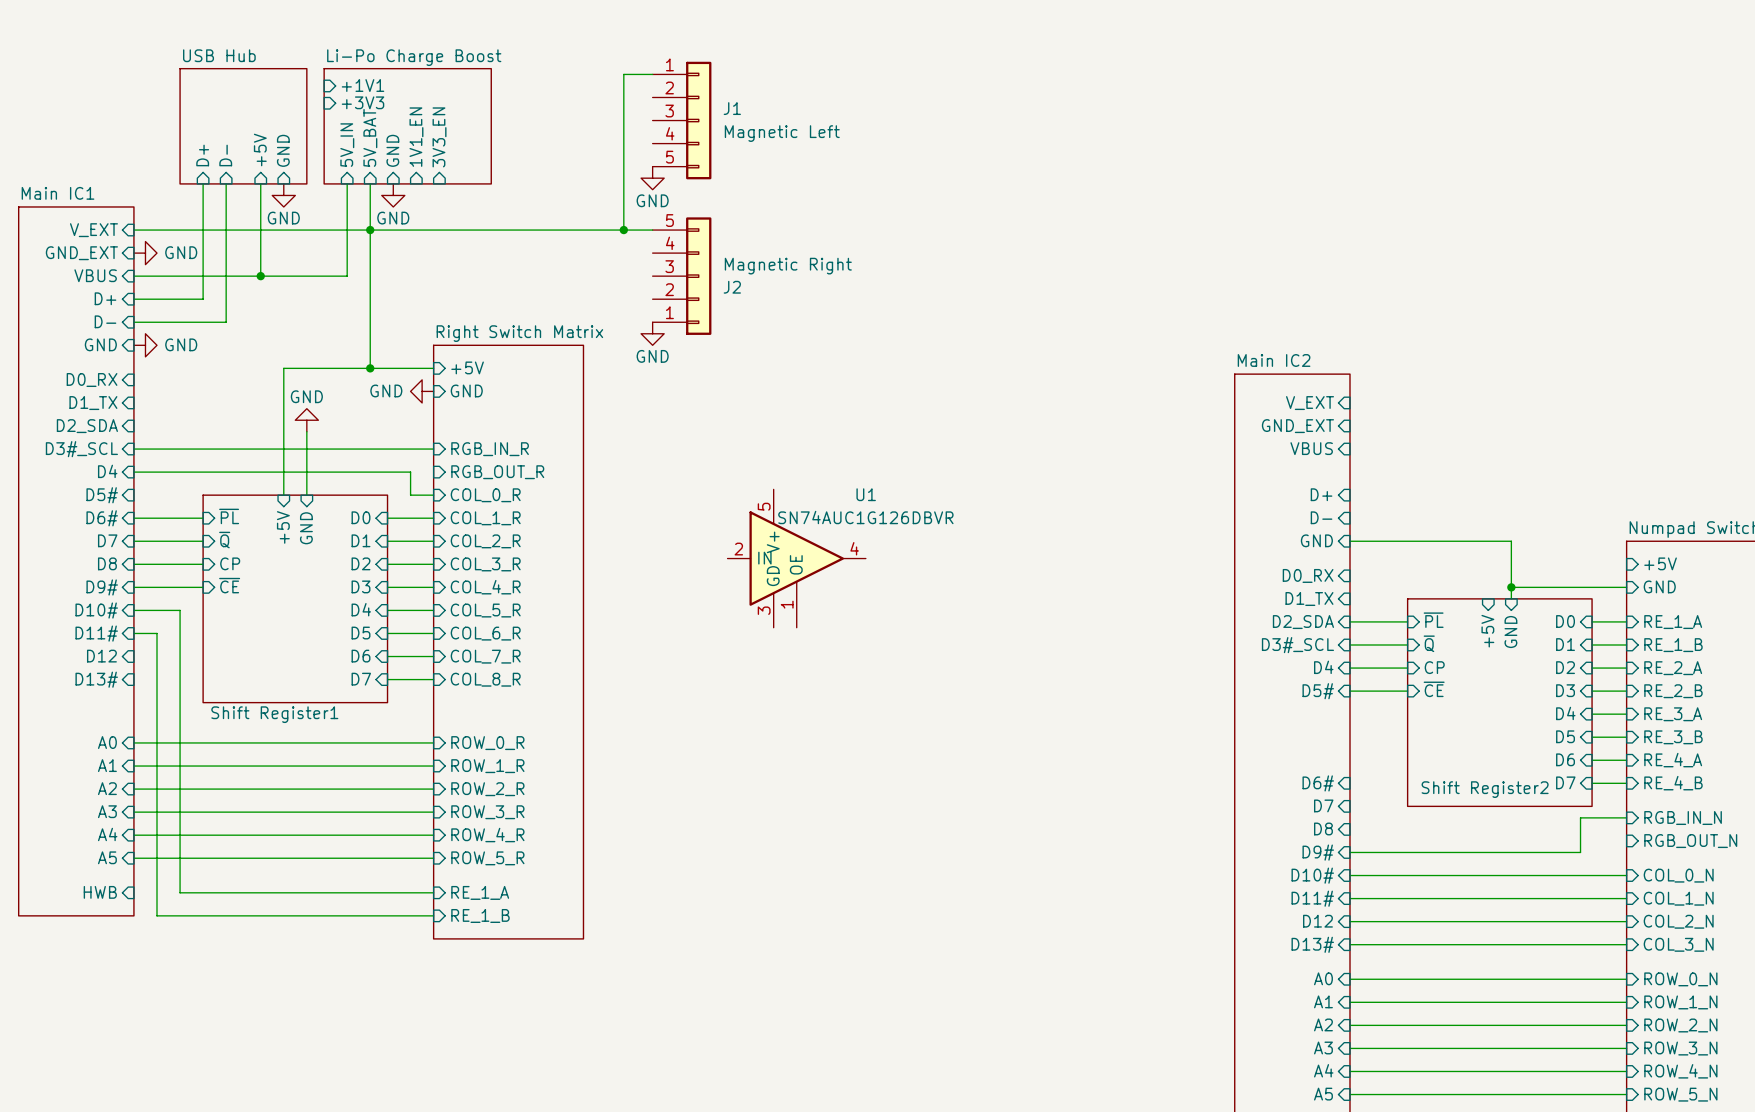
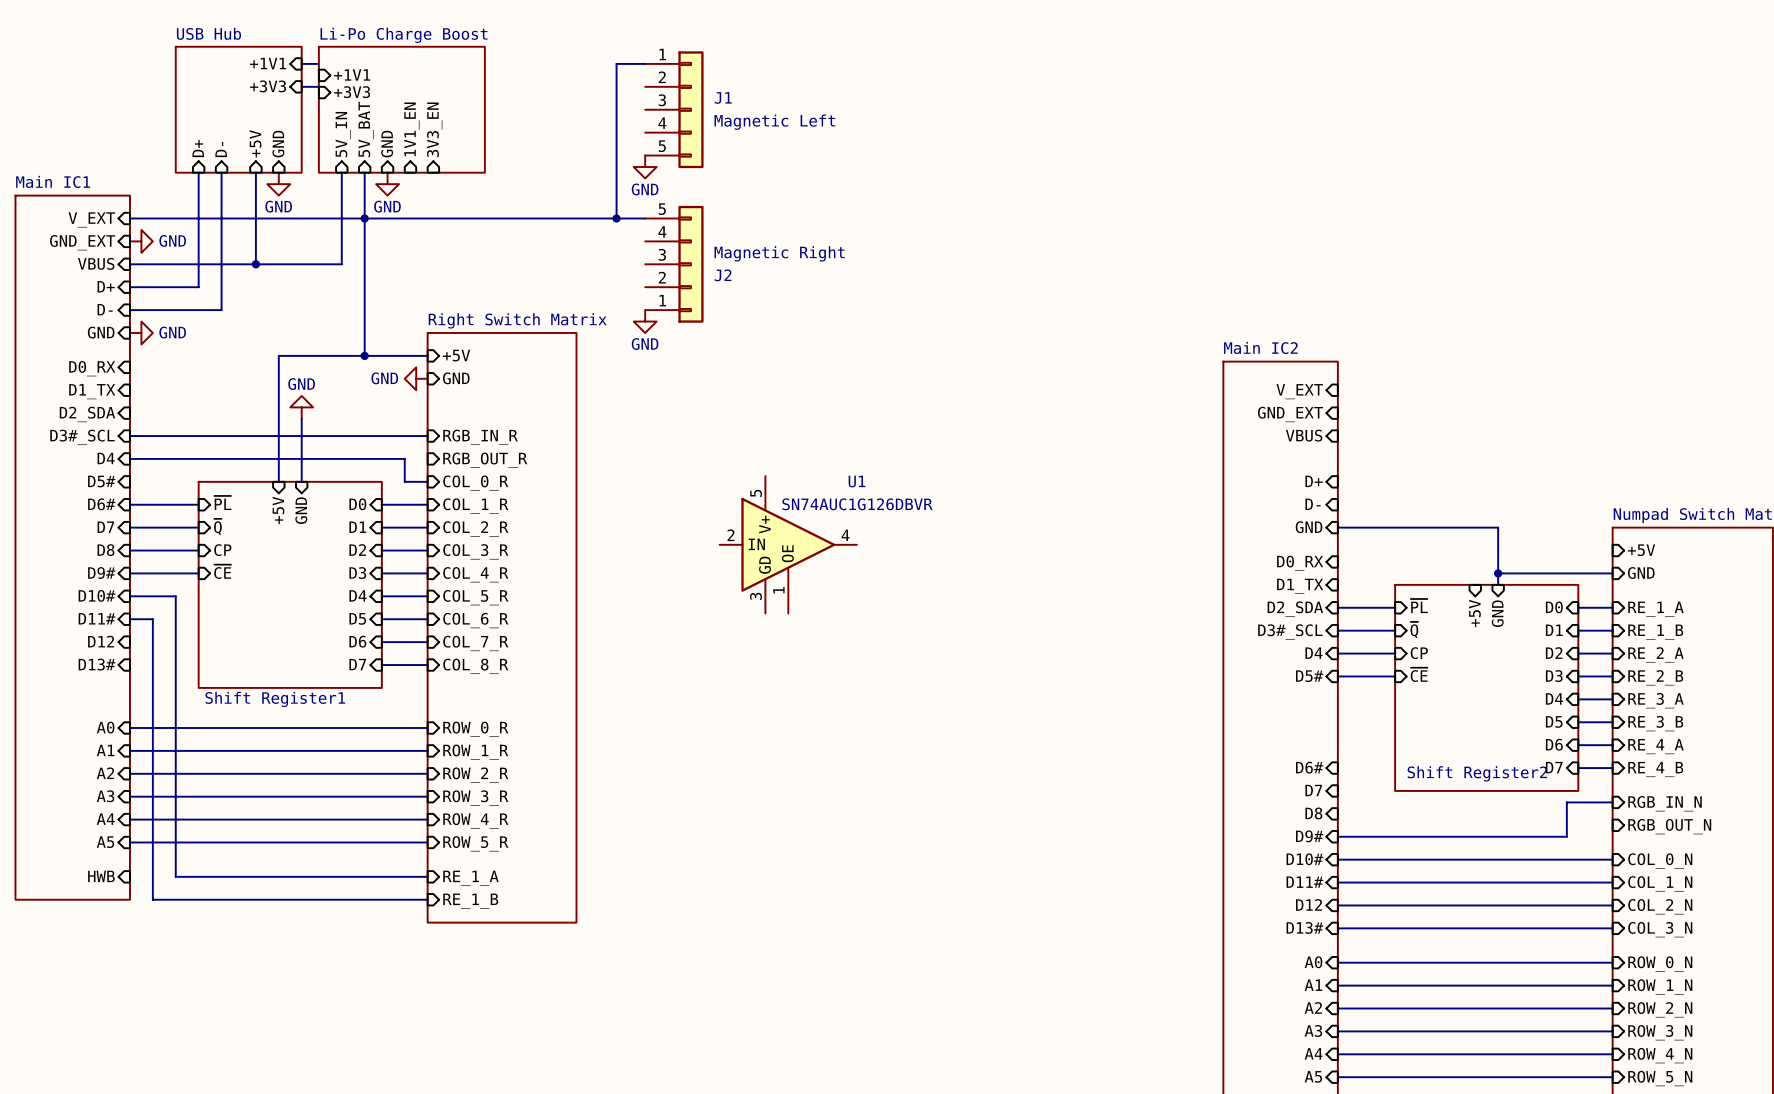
sheet USB Hub shape: [179, 67, 308, 185] -> [175, 46, 303, 174]
sheet Li-Po Charge Boost shape: [323, 67, 492, 185] -> [318, 46, 486, 174]
sheet pin: none -> +1V1 (268, 63)
wire: none -> (301, 63) (318, 63)
sheet pin: none -> +3V3 (268, 86)
wire: none -> (301, 86) (318, 86)

